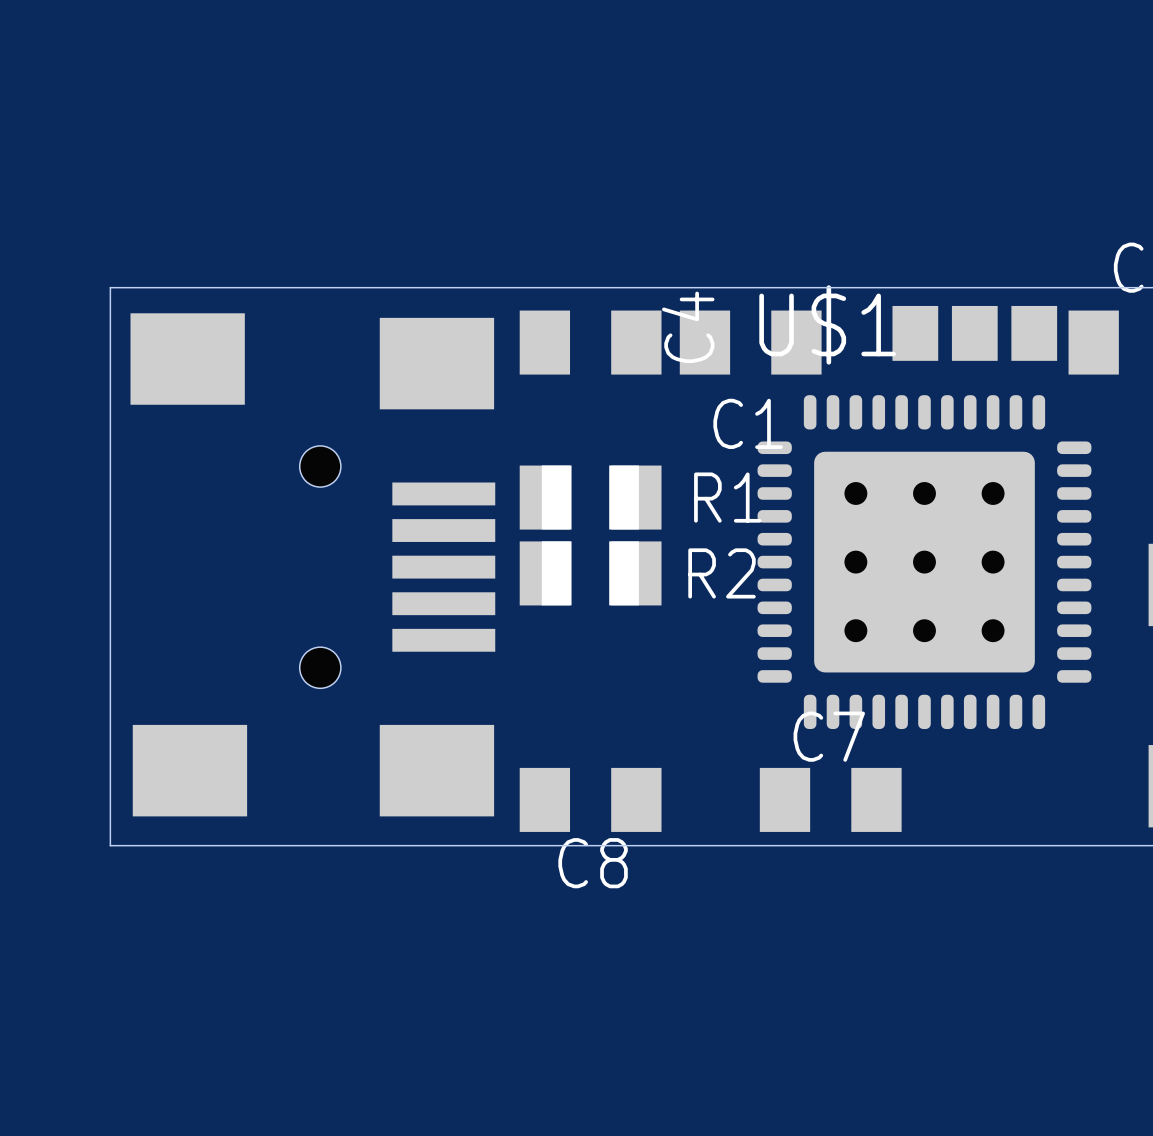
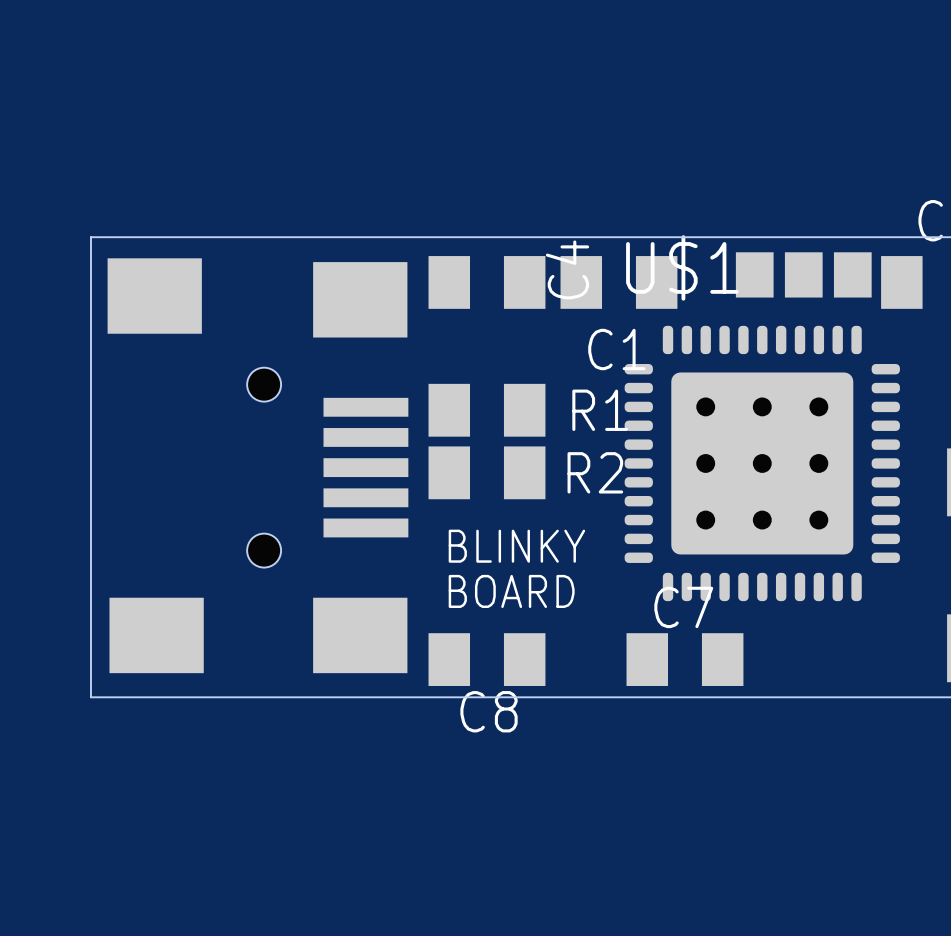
R1 footprint: [519, 465, 662, 530] -> [428, 383, 546, 437]
R2 footprint: [519, 541, 662, 606] -> [428, 446, 546, 500]
text: none -> BLINKY (516, 546)
text: none -> BOARD (511, 591)

